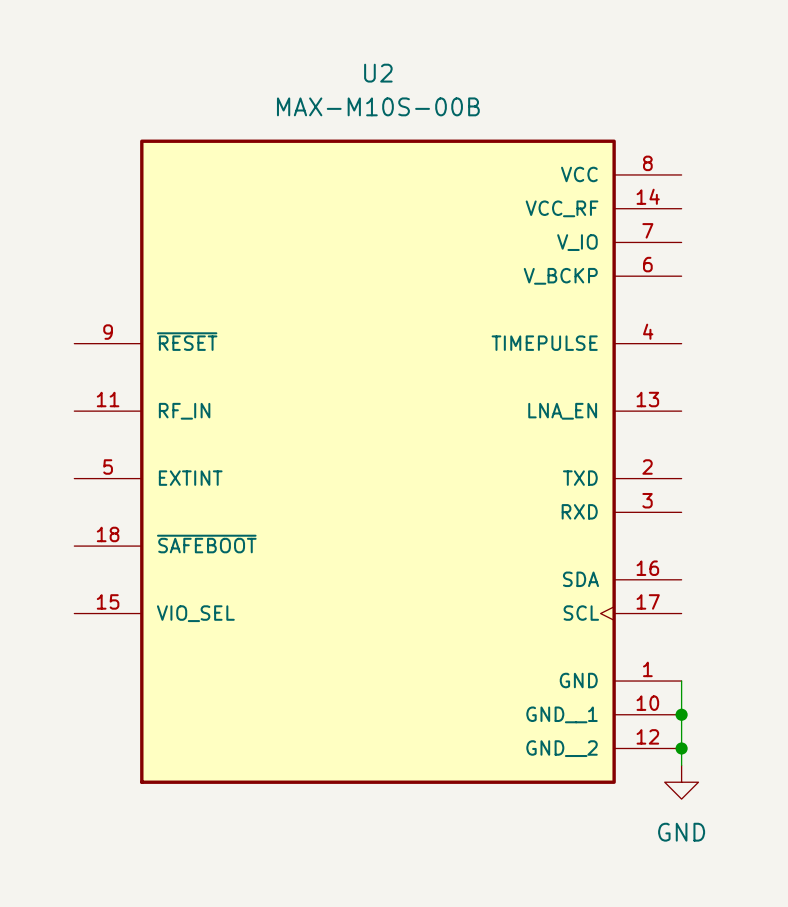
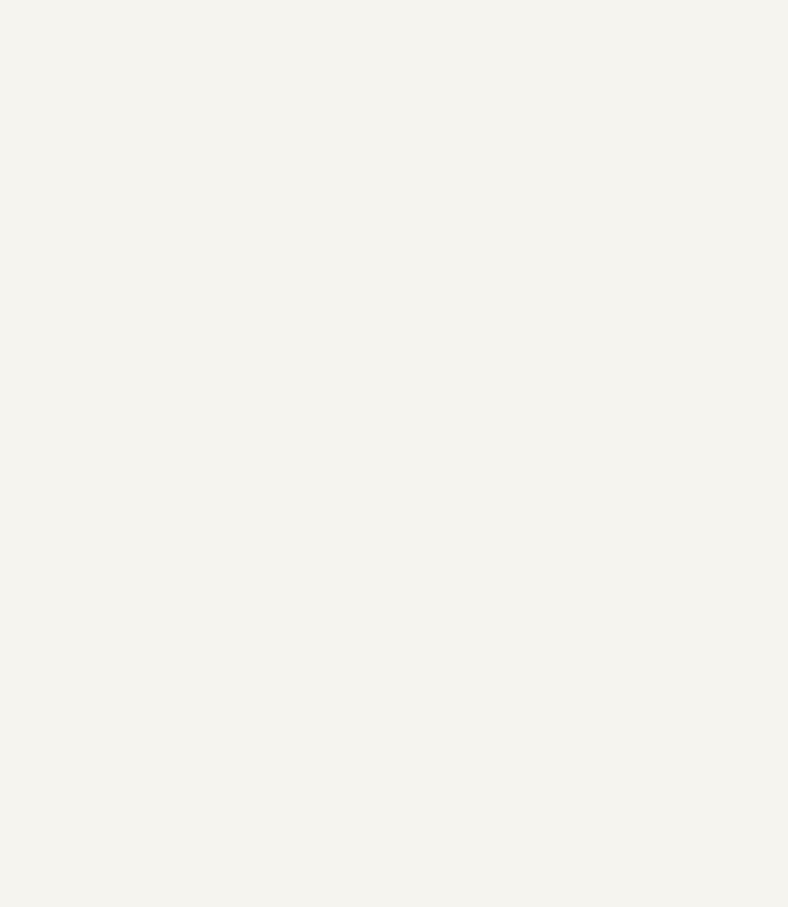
U2: MAX-M10S-00B (377, 461) -> none
wire: (681, 681) (681, 765) -> none
junction: (681, 714) -> none
junction: (681, 748) -> none
power symbol: GND (681, 782) -> none

